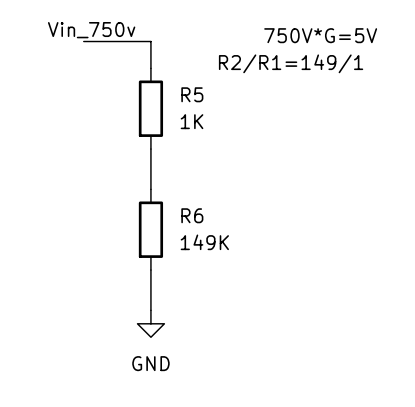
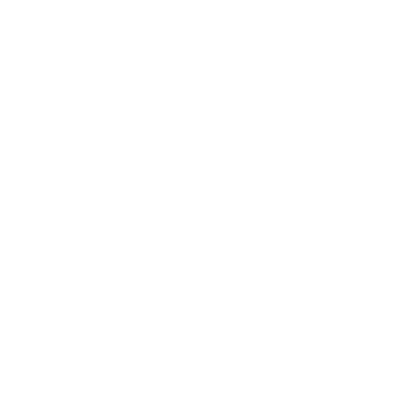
label: Vin_750v (91, 30) -> none
text: 750V*G=5V (320, 35) -> none
wire: (83, 41) (150, 41) (150, 68) -> none
text: R2/R1=149/1 (291, 63) -> none
R5: 1K (150, 108) -> none
wire: (150, 149) (150, 189) -> none
R6: 149K (150, 229) -> none
wire: (150, 270) (150, 310) -> none
power symbol: GND (150, 323) -> none

